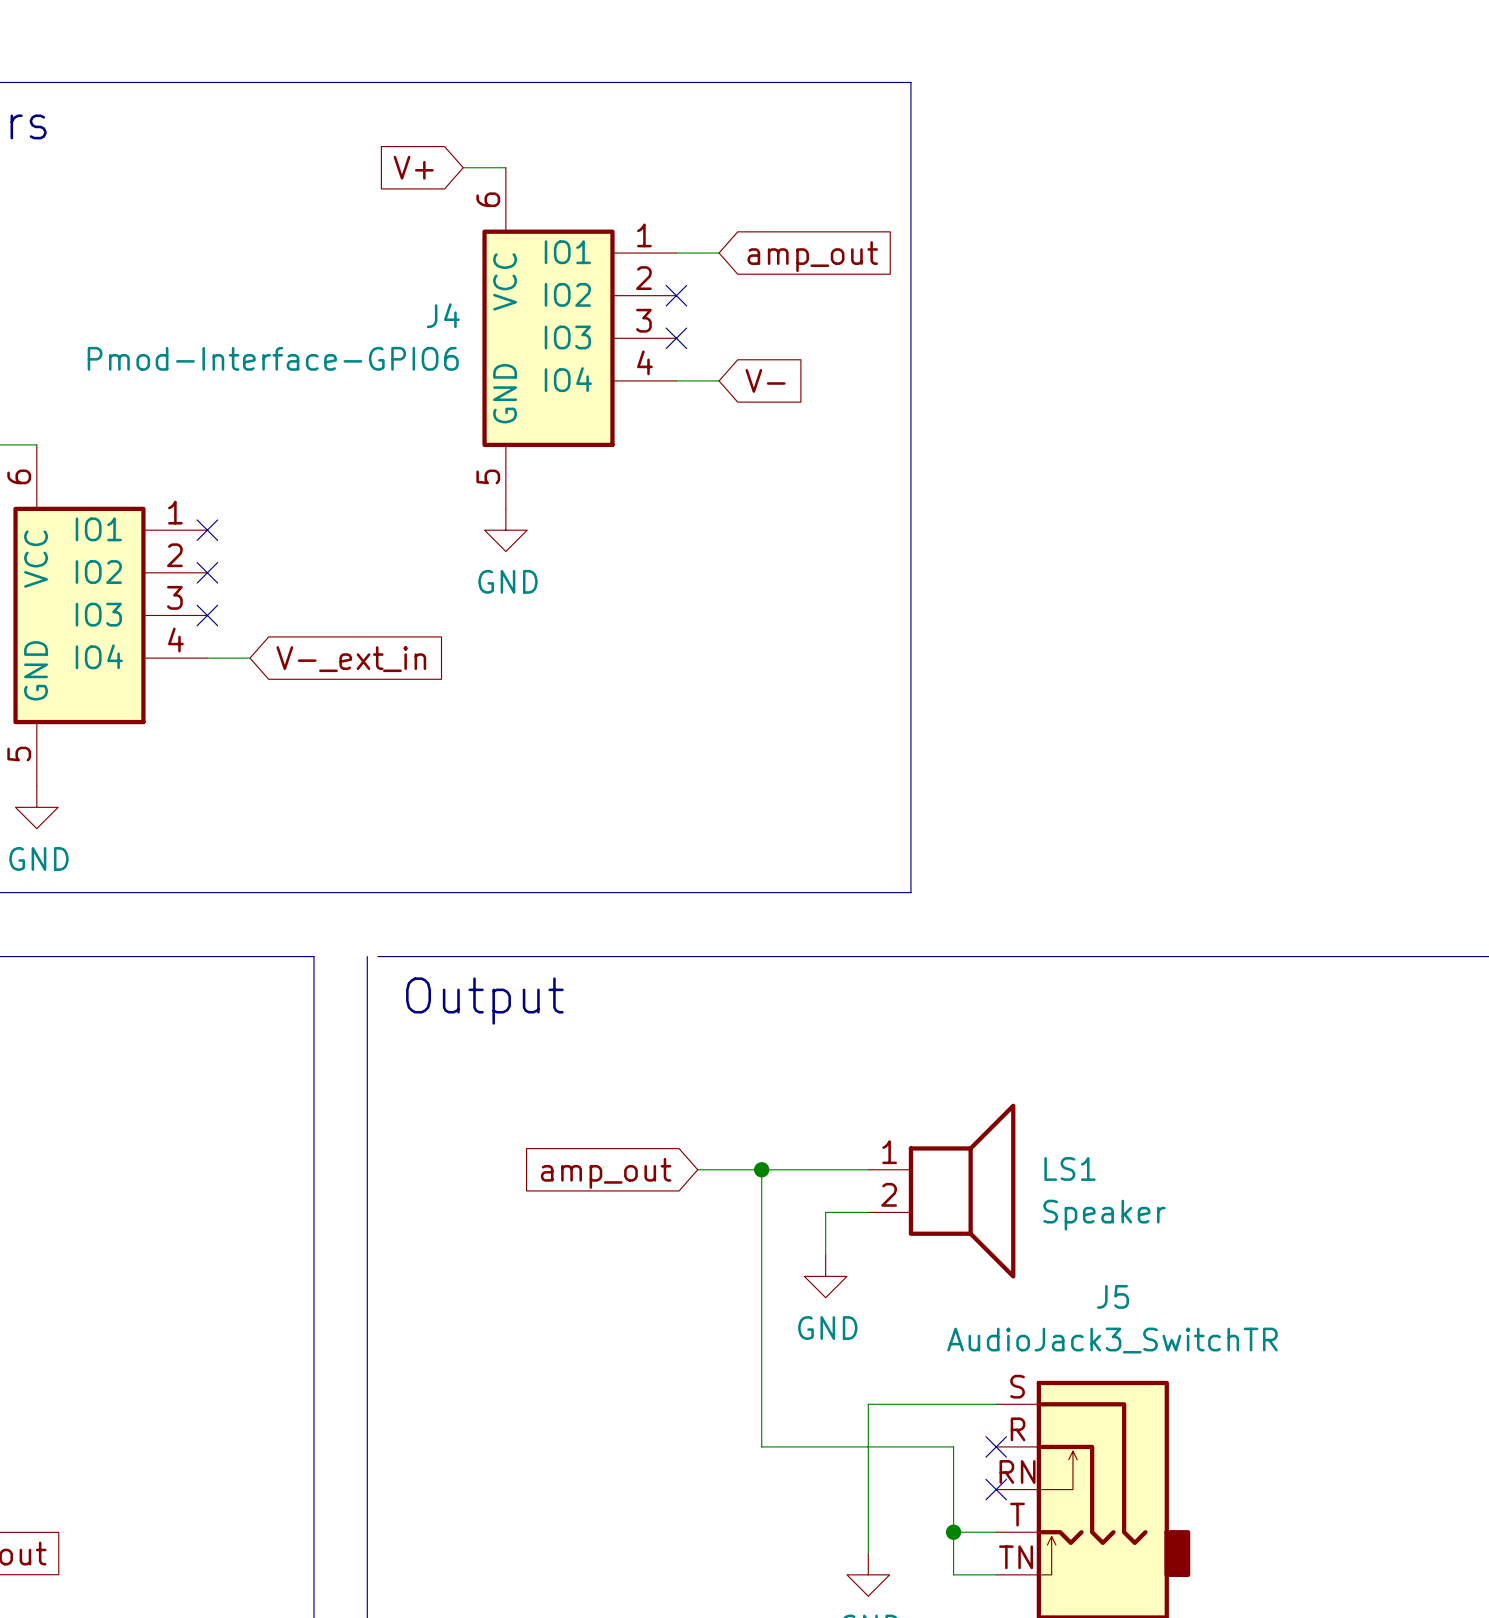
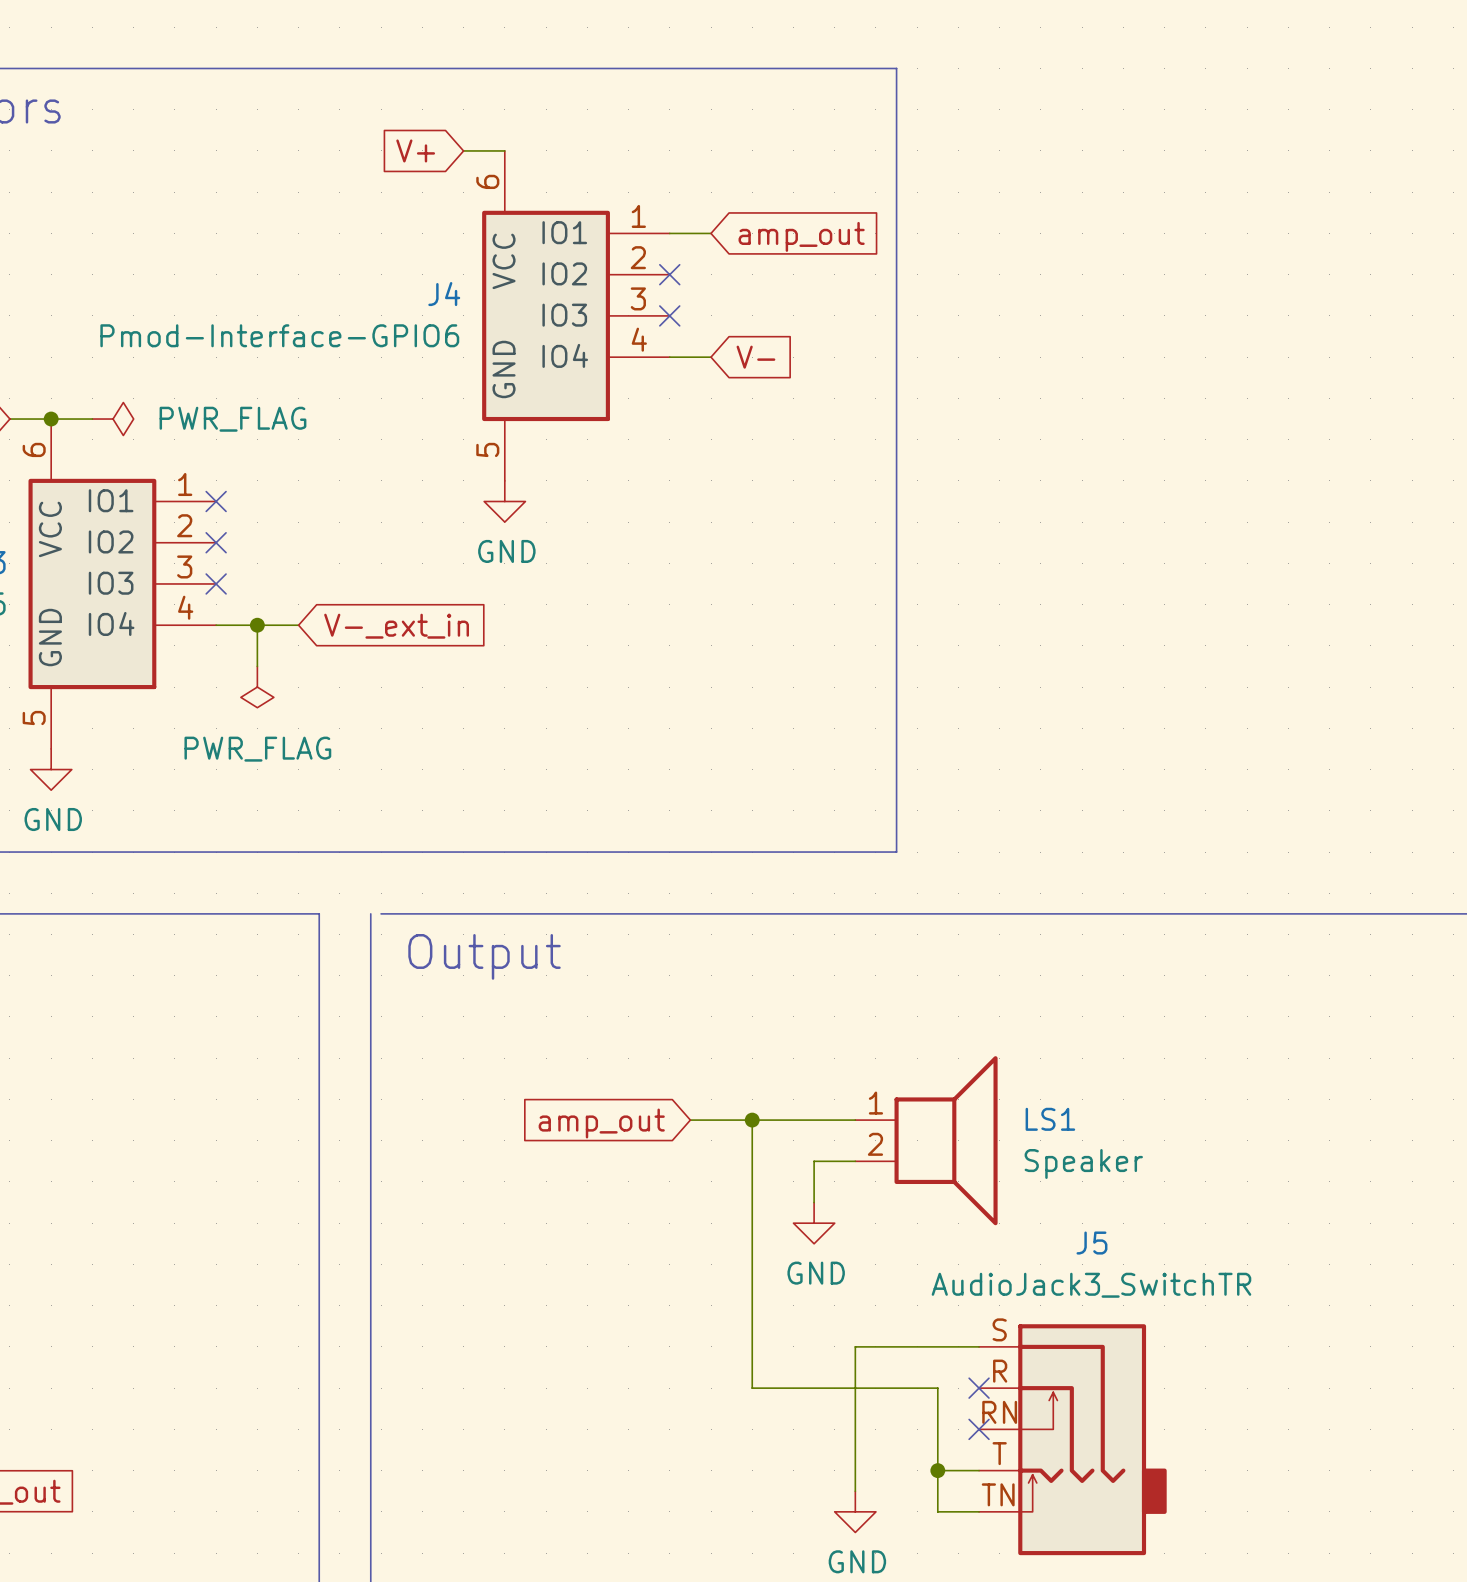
wire: none -> (51, 419) (92, 419)
junction: none -> (51, 419)
power symbol: none -> PWR_FLAG (113, 419)
junction: none -> (257, 625)
wire: none -> (298, 625) (257, 625) (257, 666)
global label position: V-_ext_in (351, 659) -> V-_ext_in (396, 626)
power symbol: none -> PWR_FLAG (257, 687)

